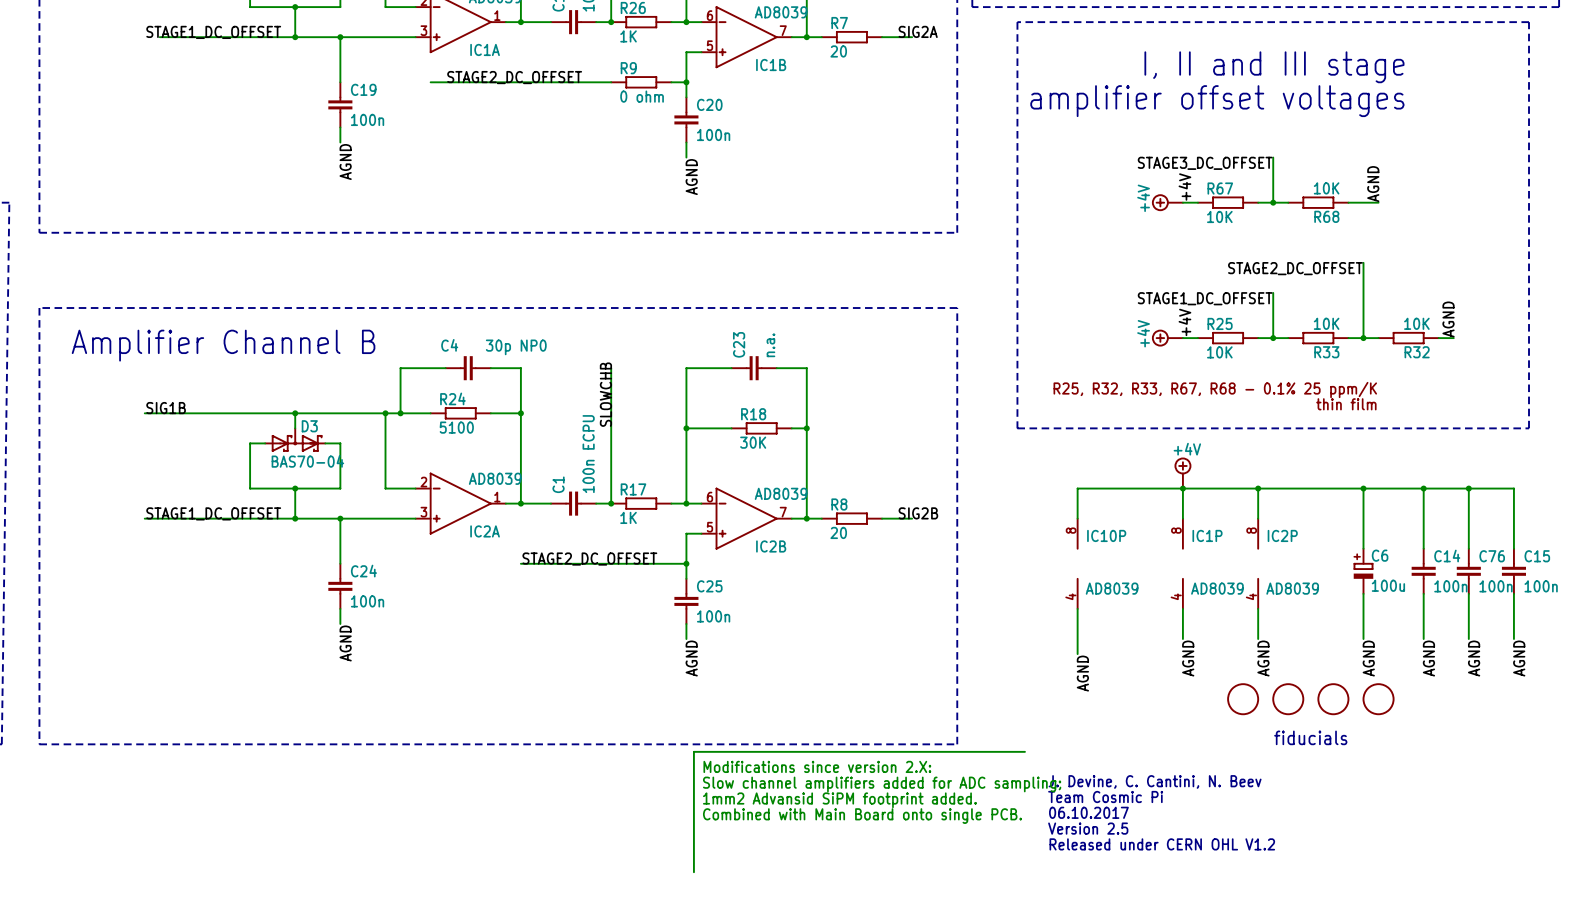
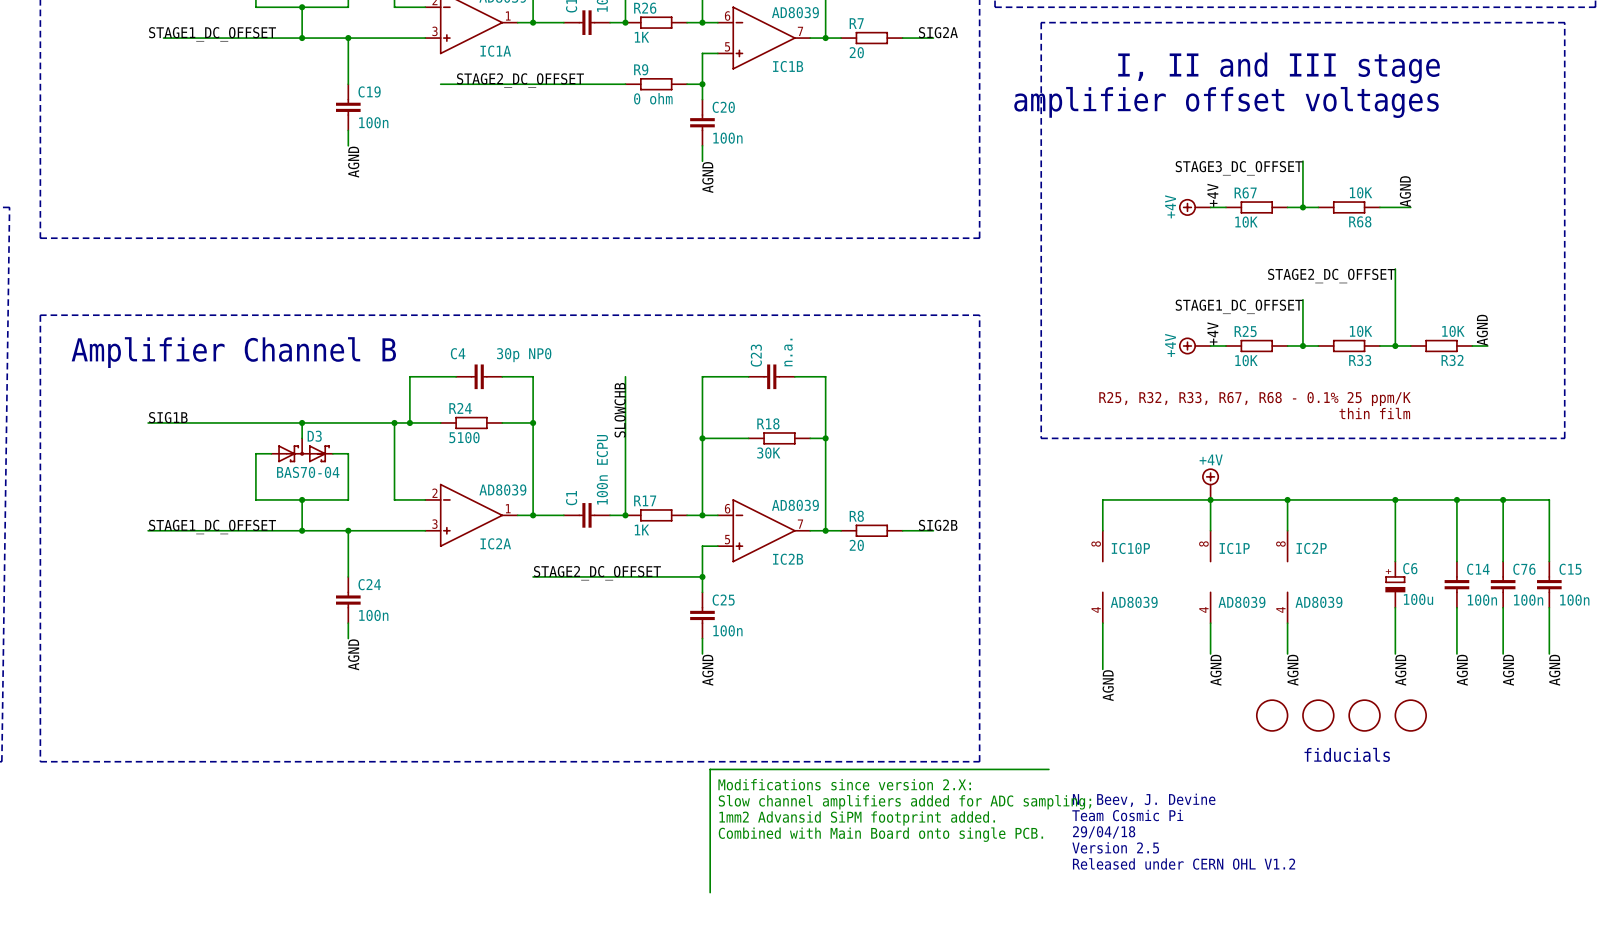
text: J. Devine, C. Cantini, N. Beev (1155, 781) -> N. Beev, J. Devine (1144, 800)
text: 06.10.2017 (1088, 812) -> 29/04/18 (1104, 832)

